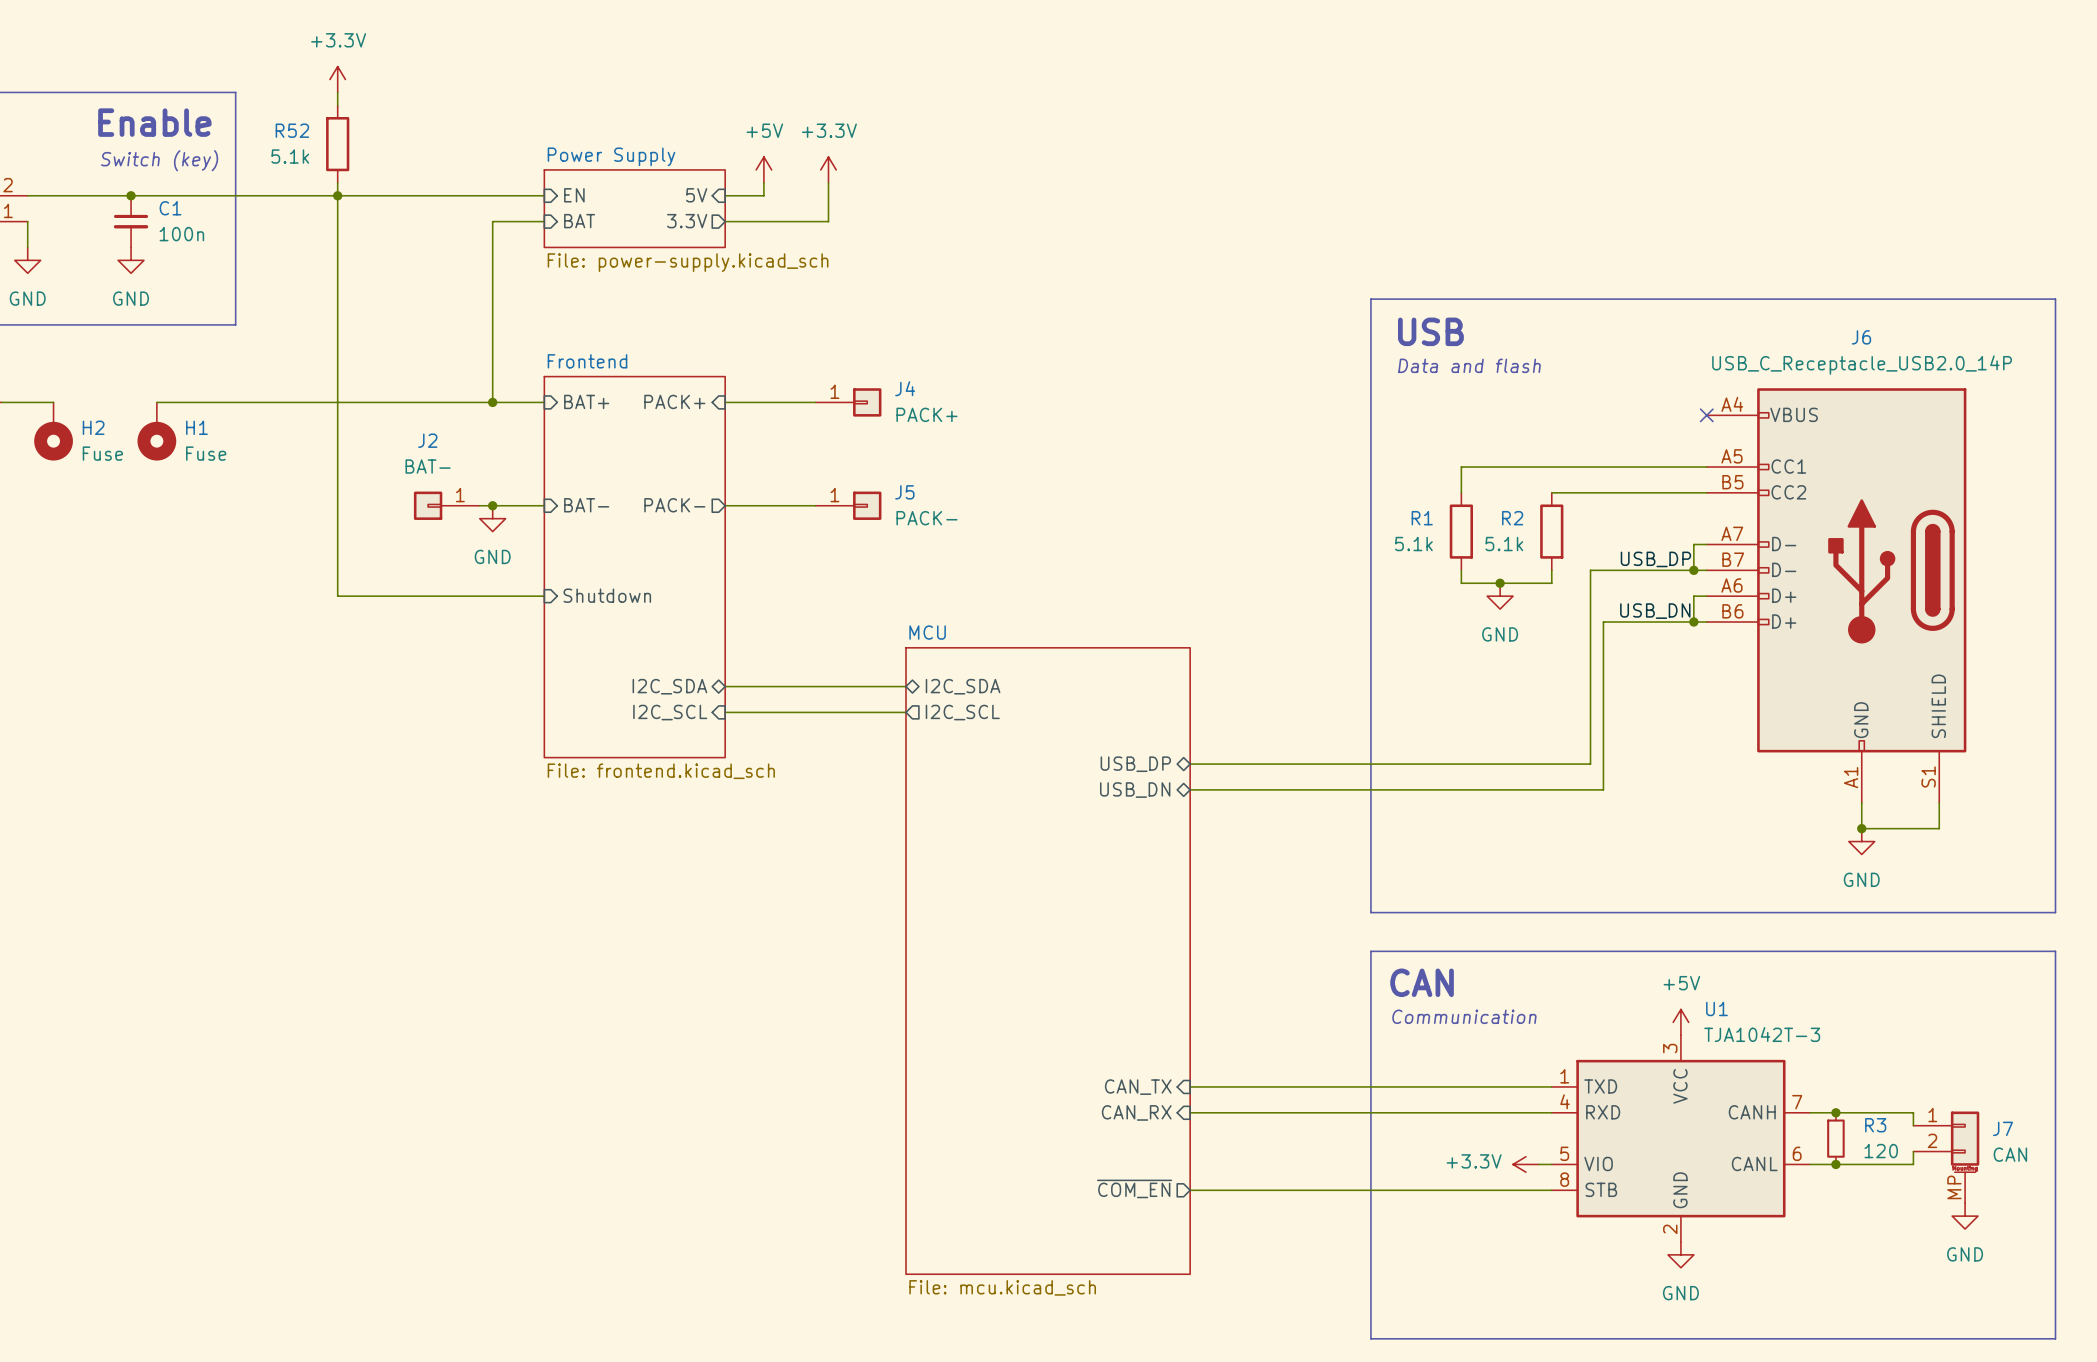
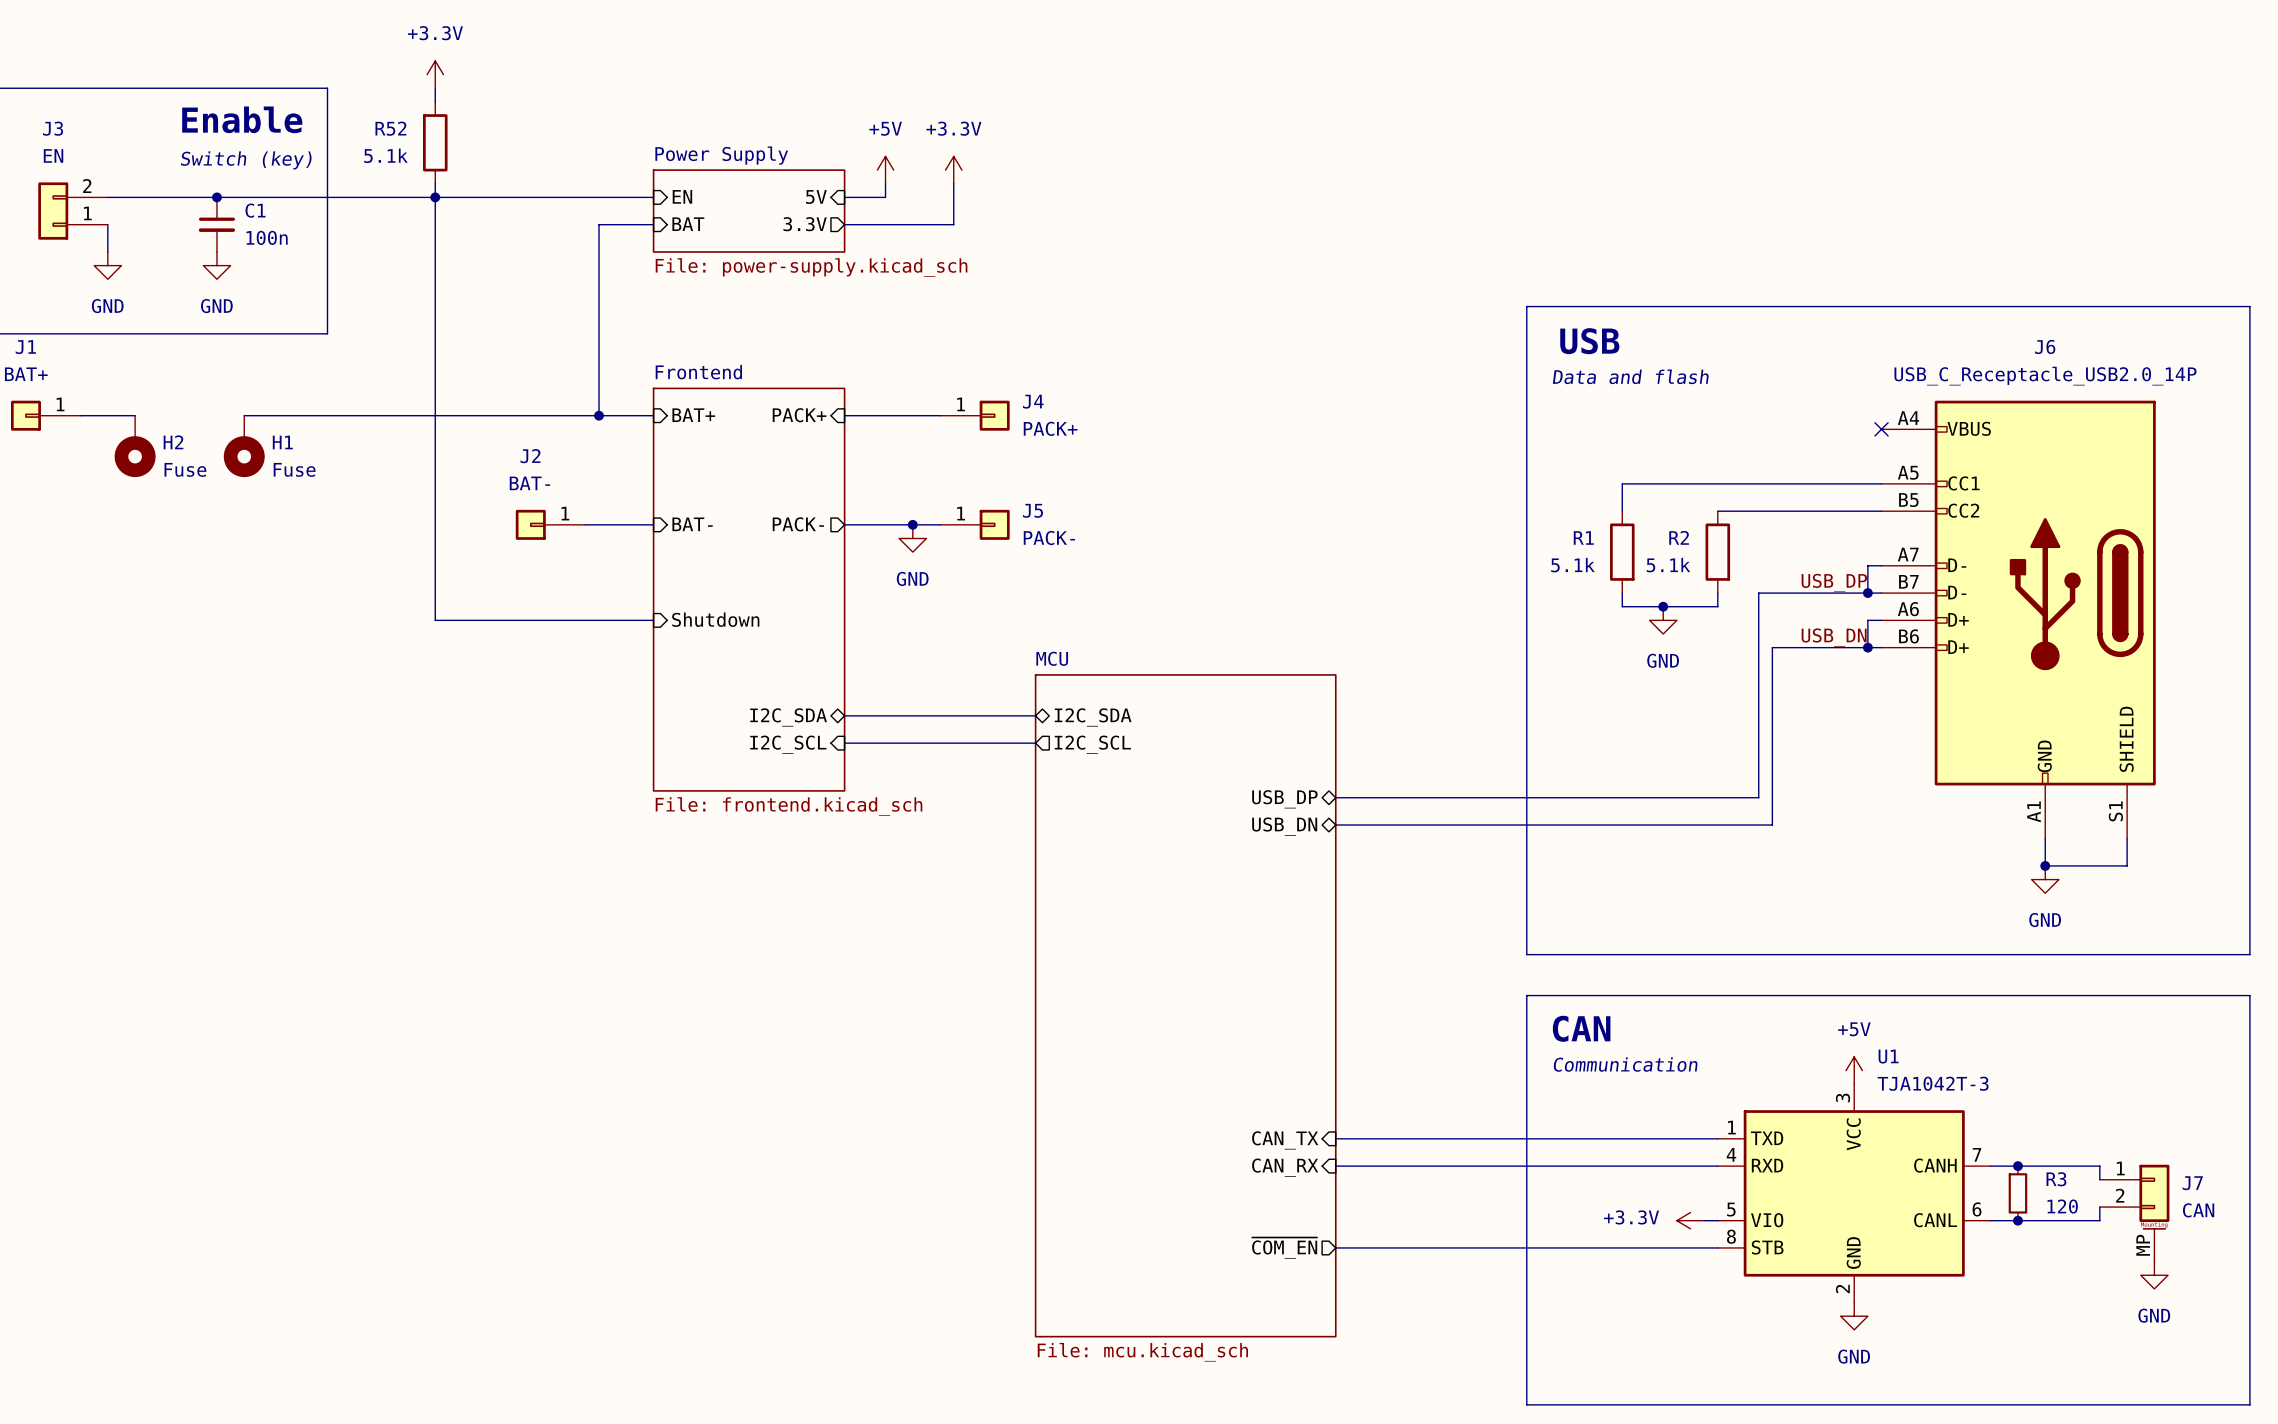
junction: (492, 505) -> none
junction: none -> (912, 524)
power symbol: GND (492, 518) -> none
power symbol: none -> GND (912, 538)

